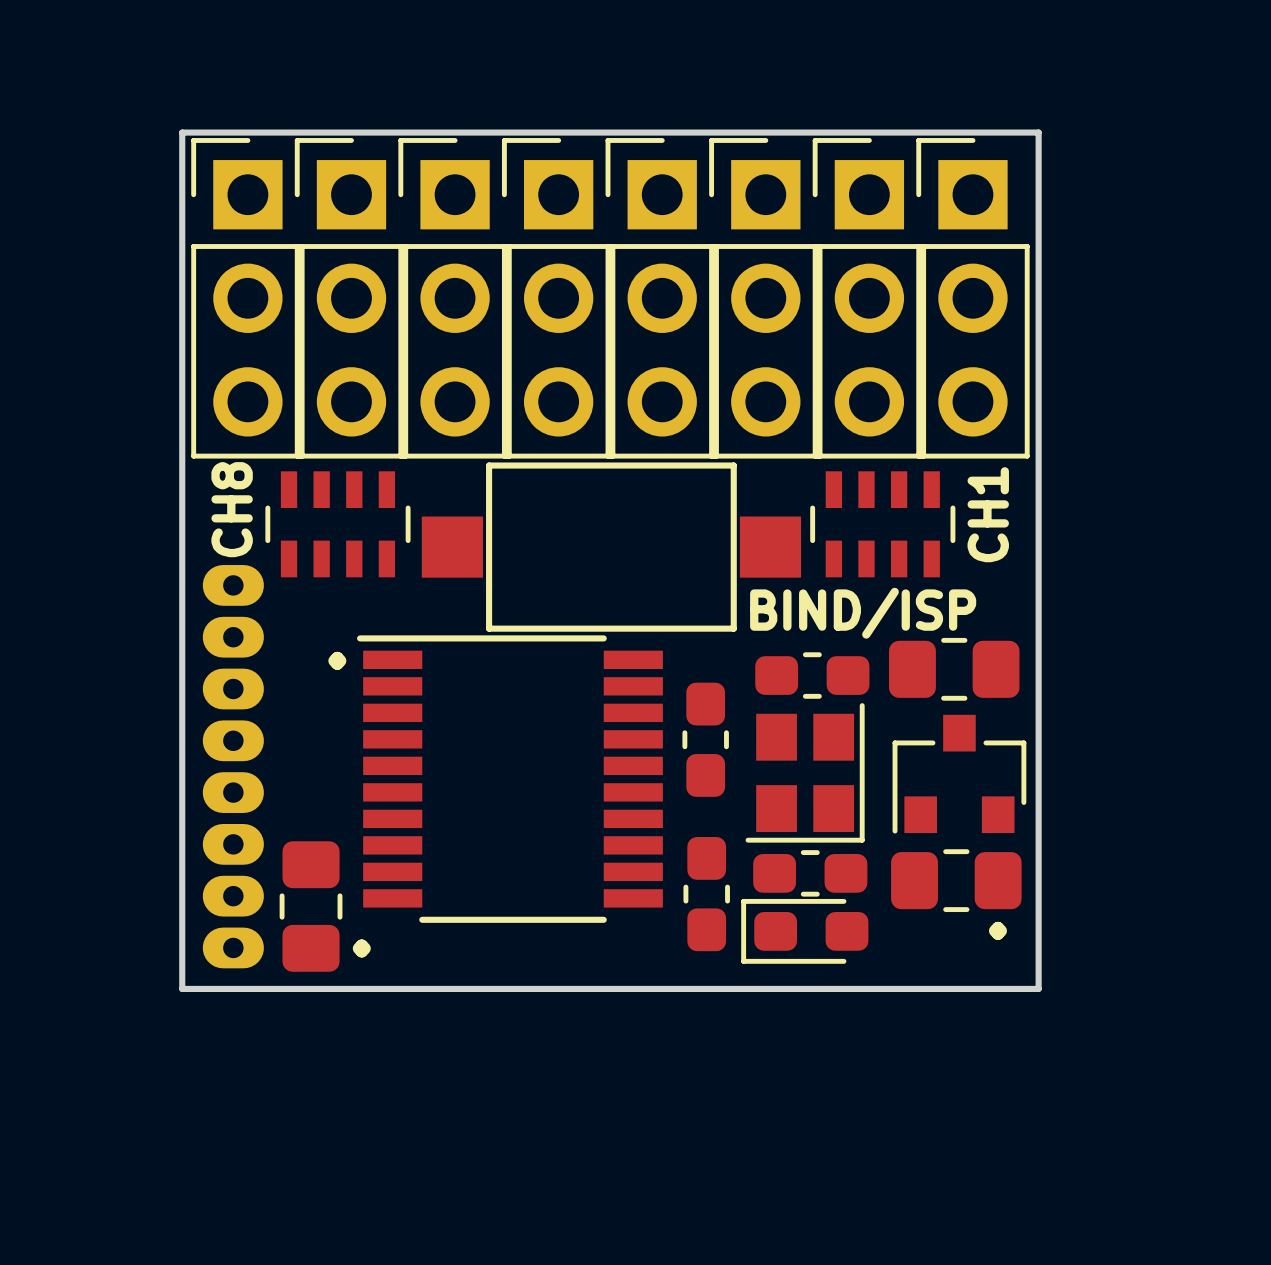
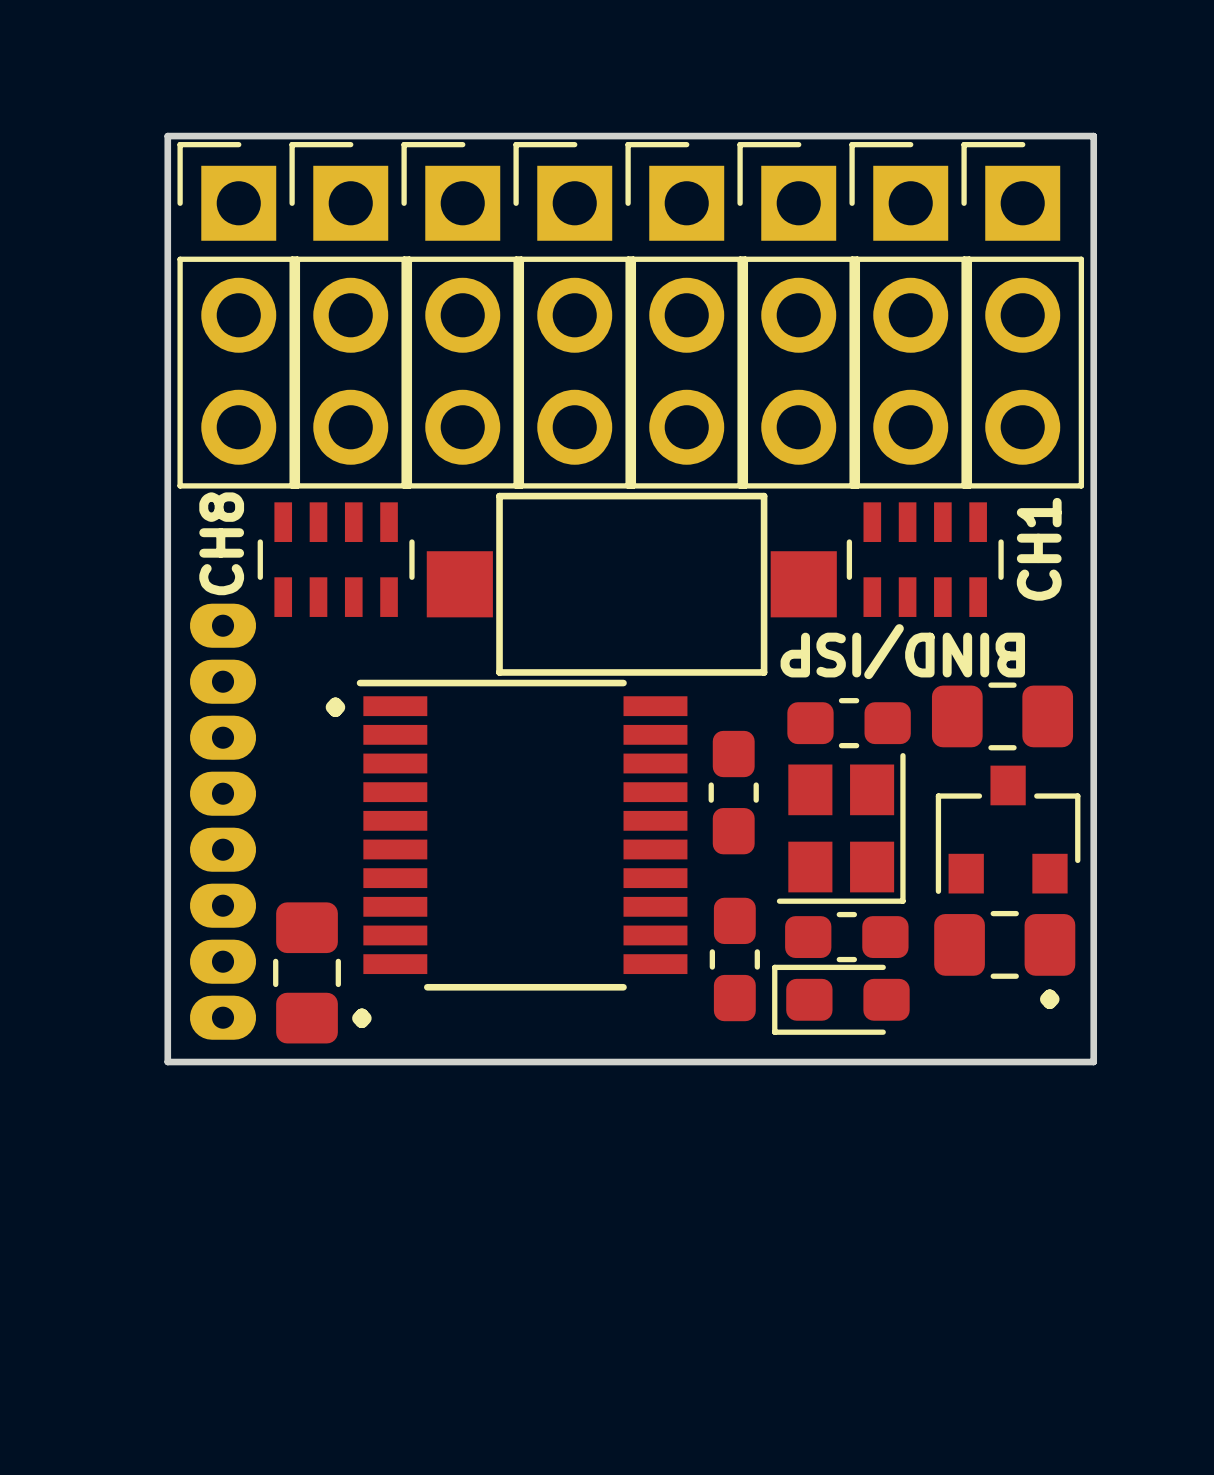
text rotation: 0° (863, 613) -> 180° (902, 651)

